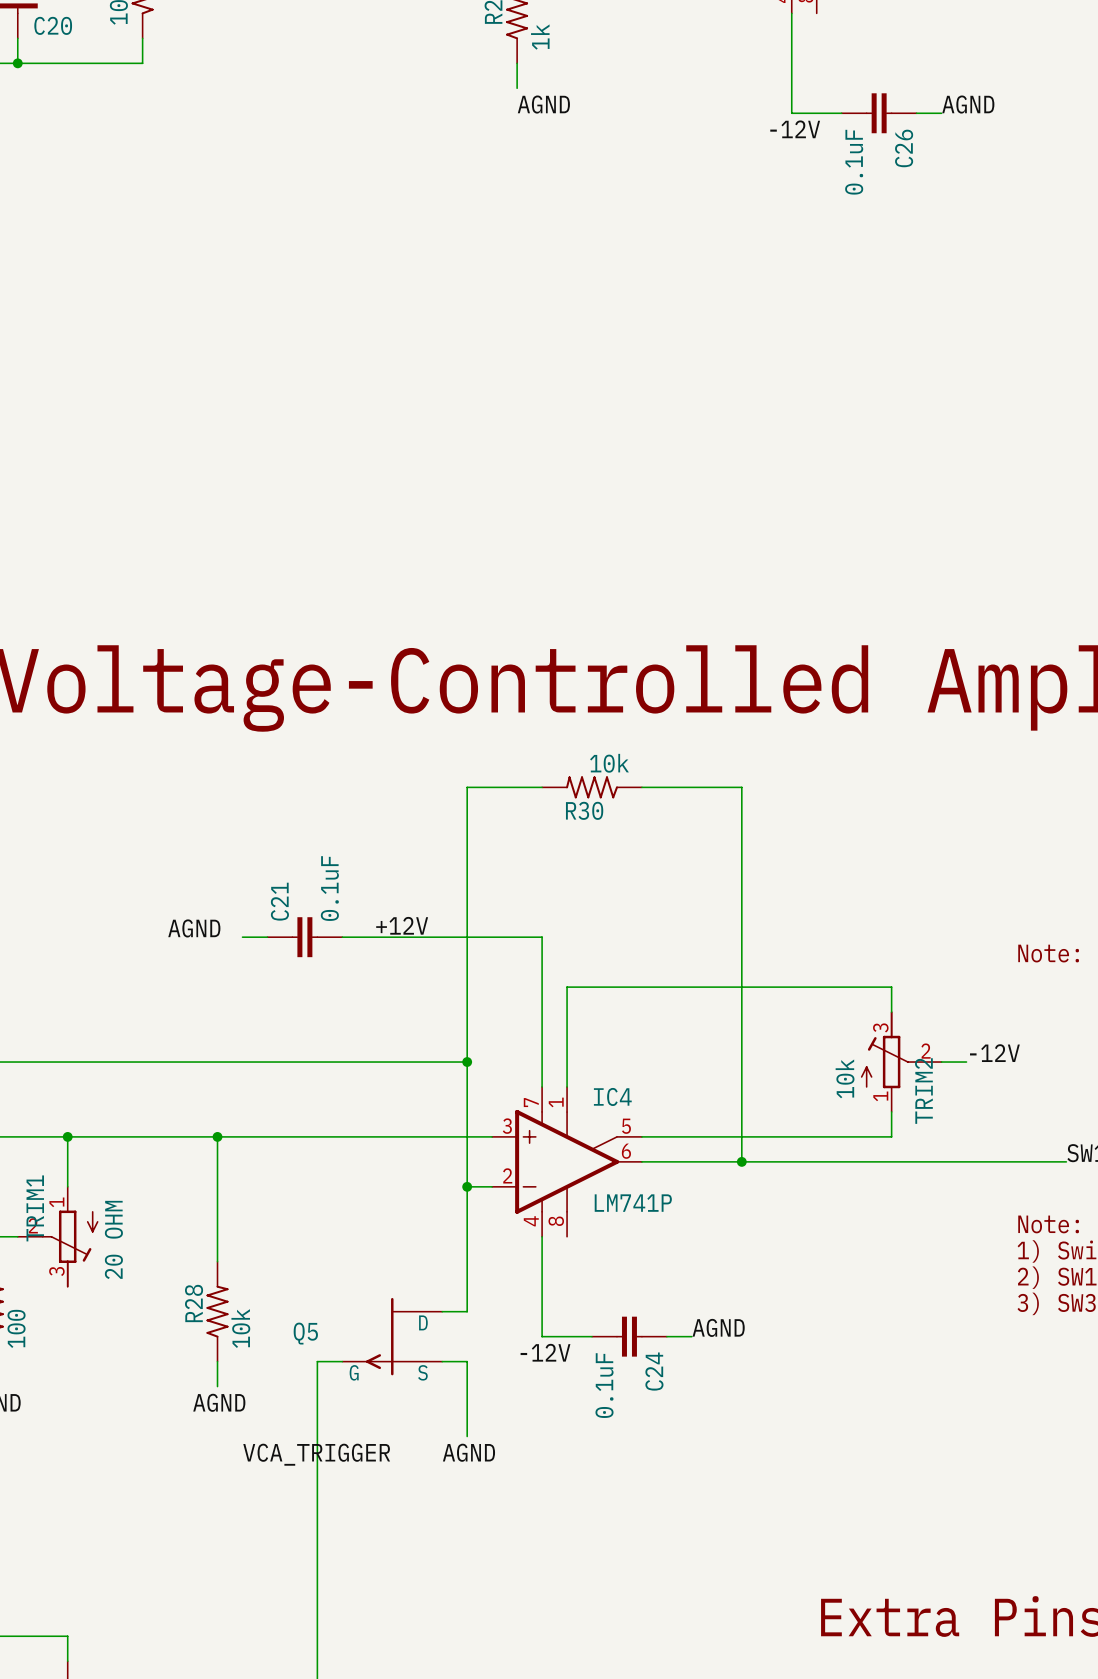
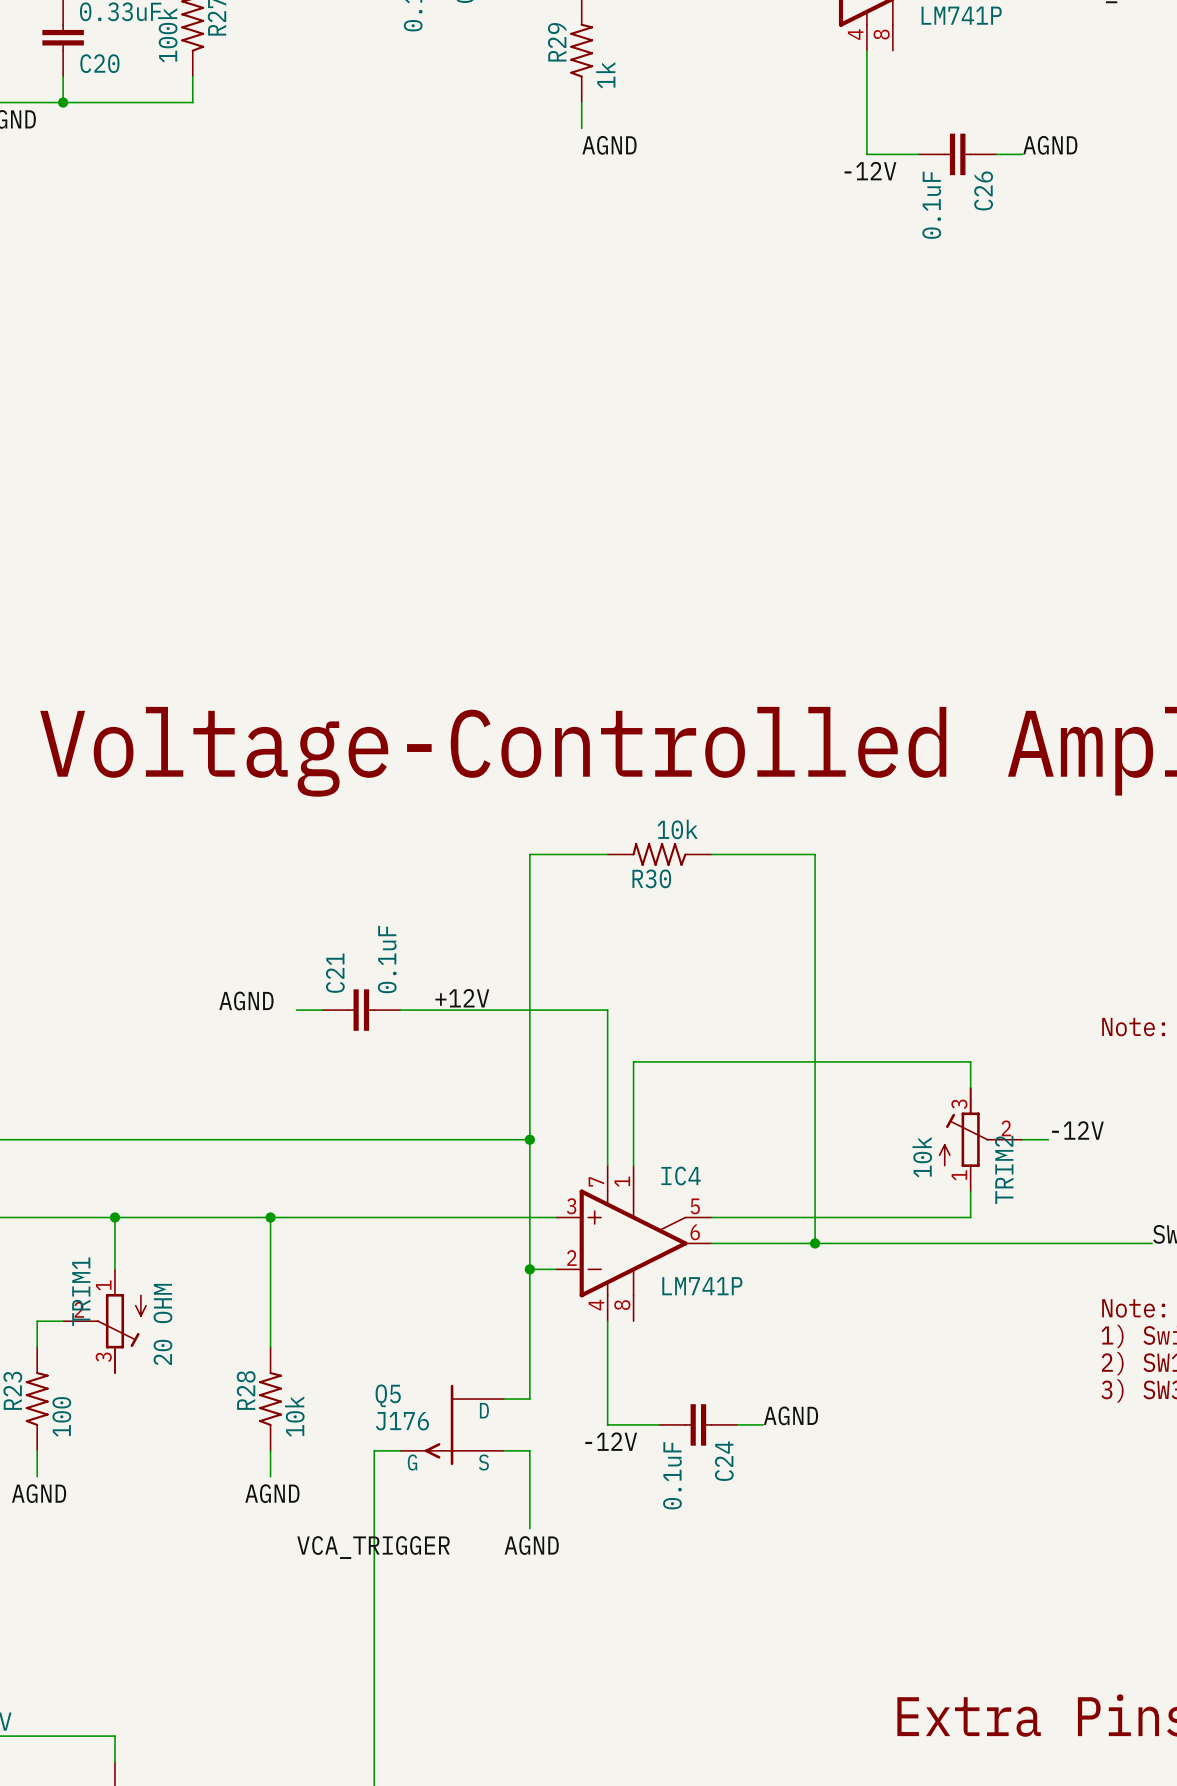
Q5 name position: Q5 (305, 1333) -> Q5 (388, 1395)
Q5 value: none -> J176 (402, 1421)

